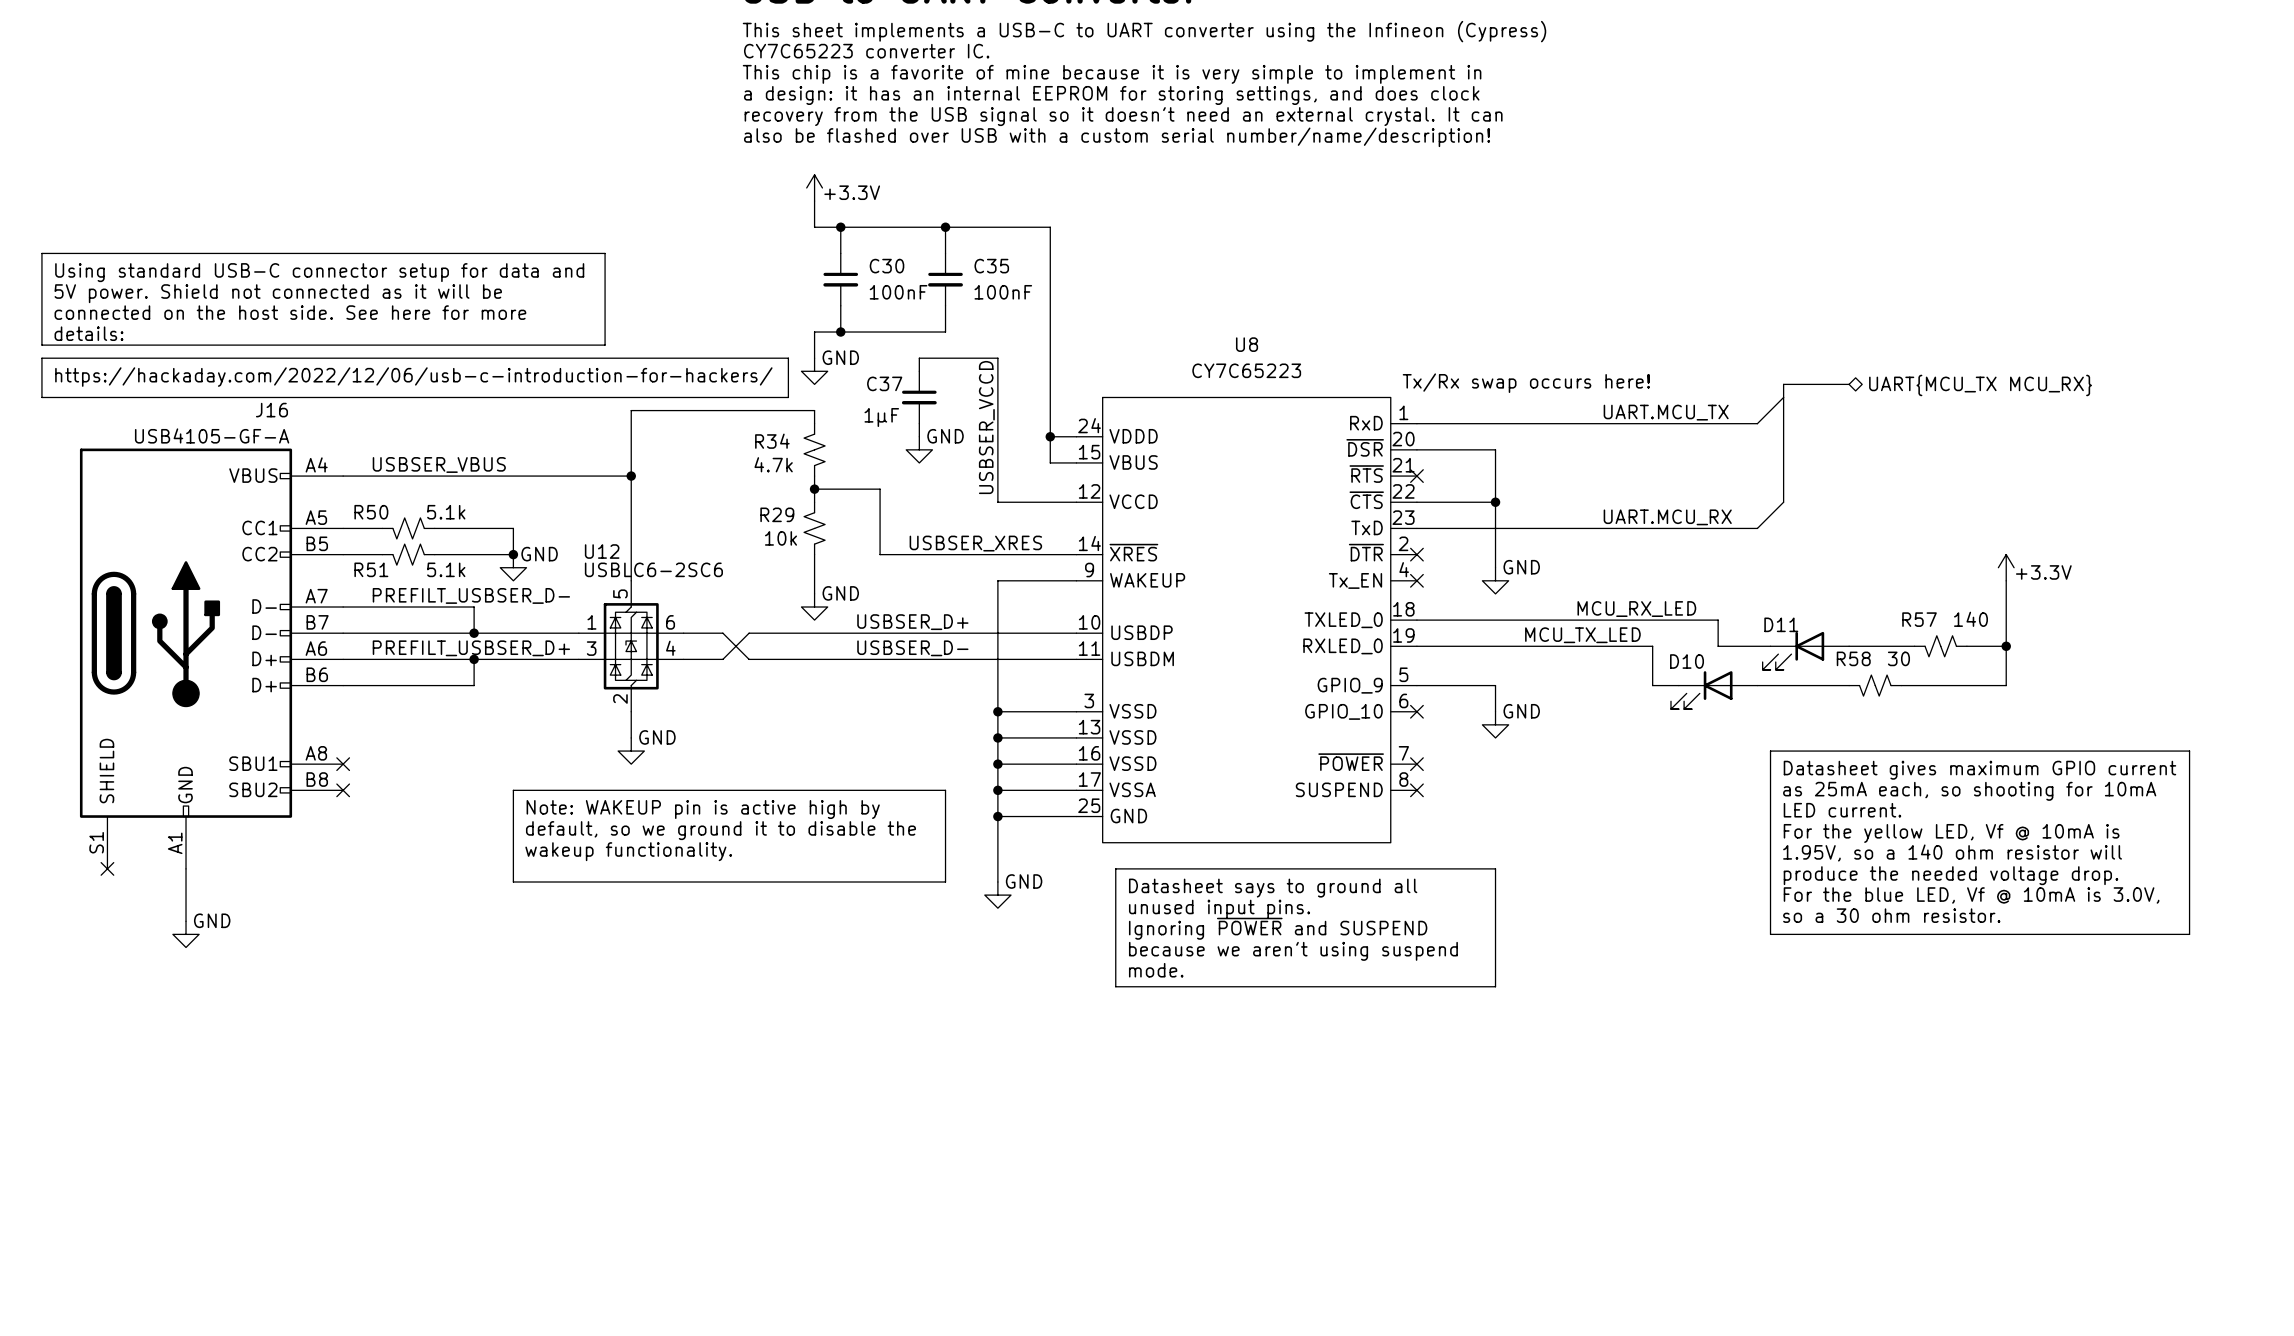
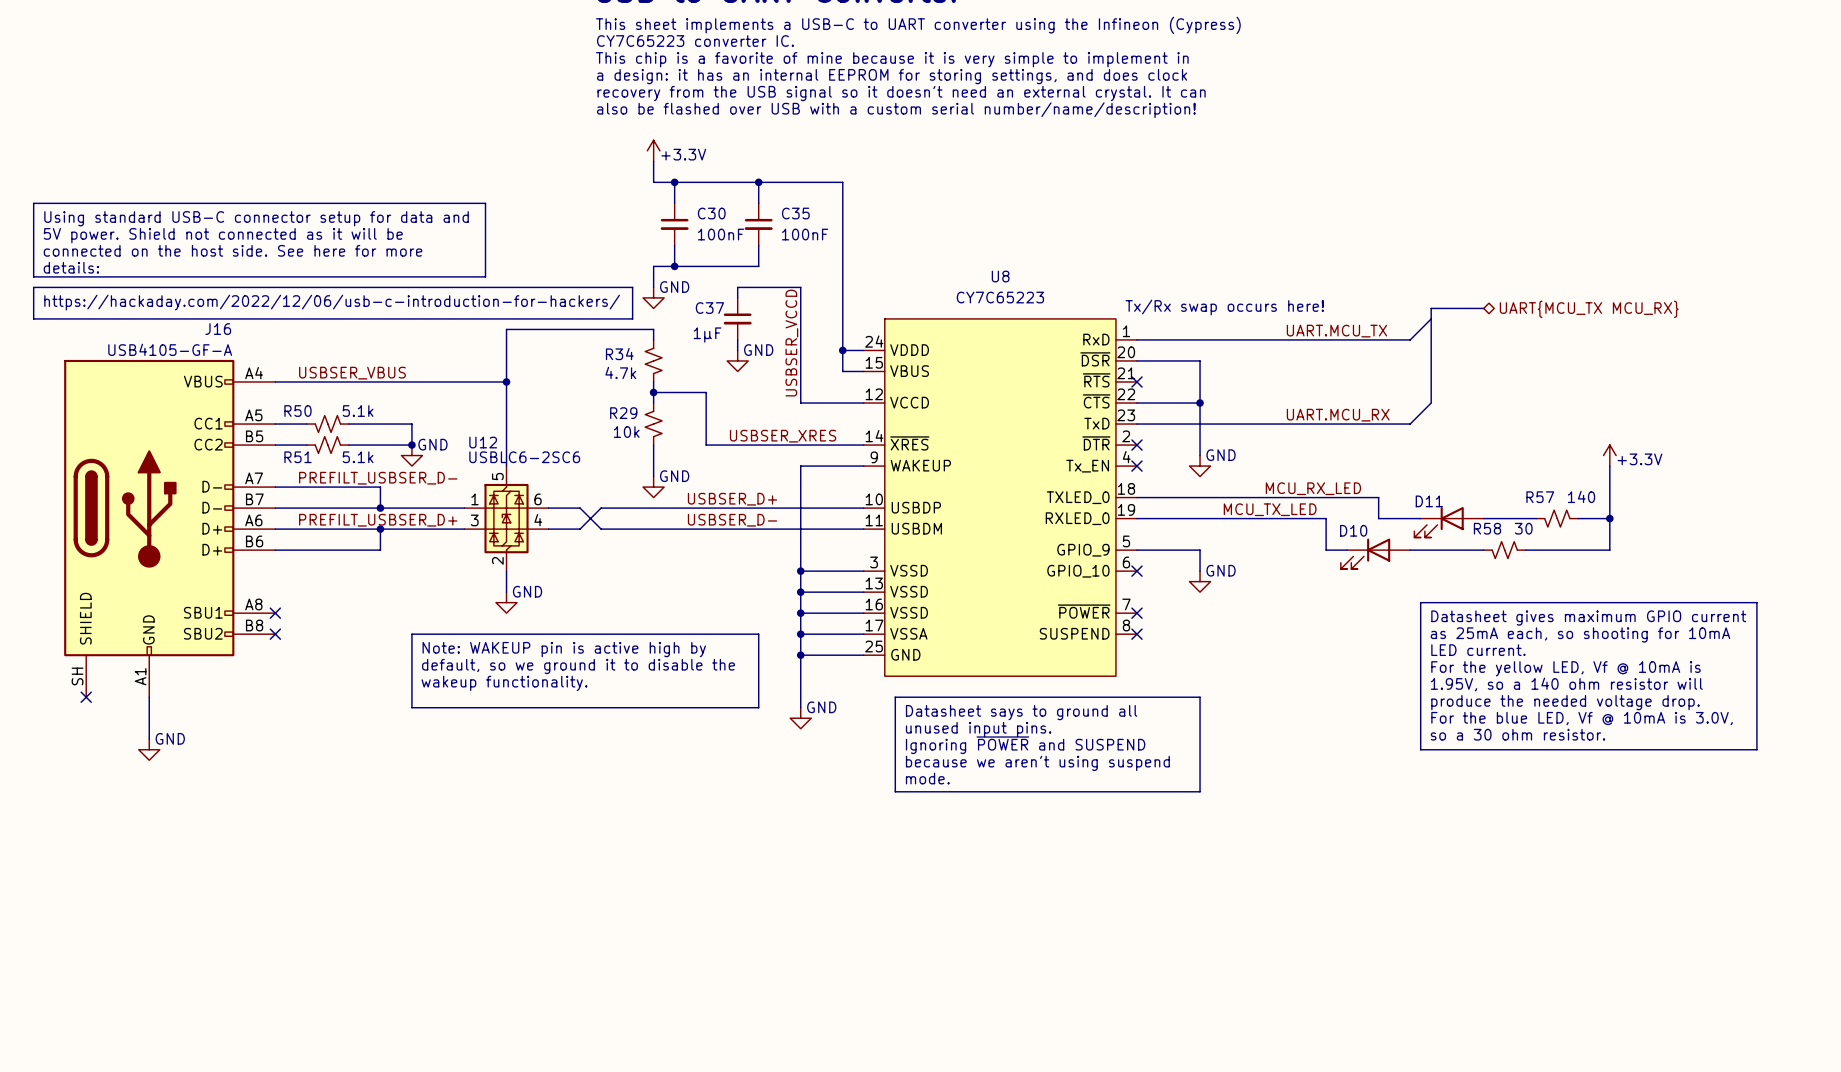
J16 pin number: S1 (96, 842) -> SH (77, 676)

